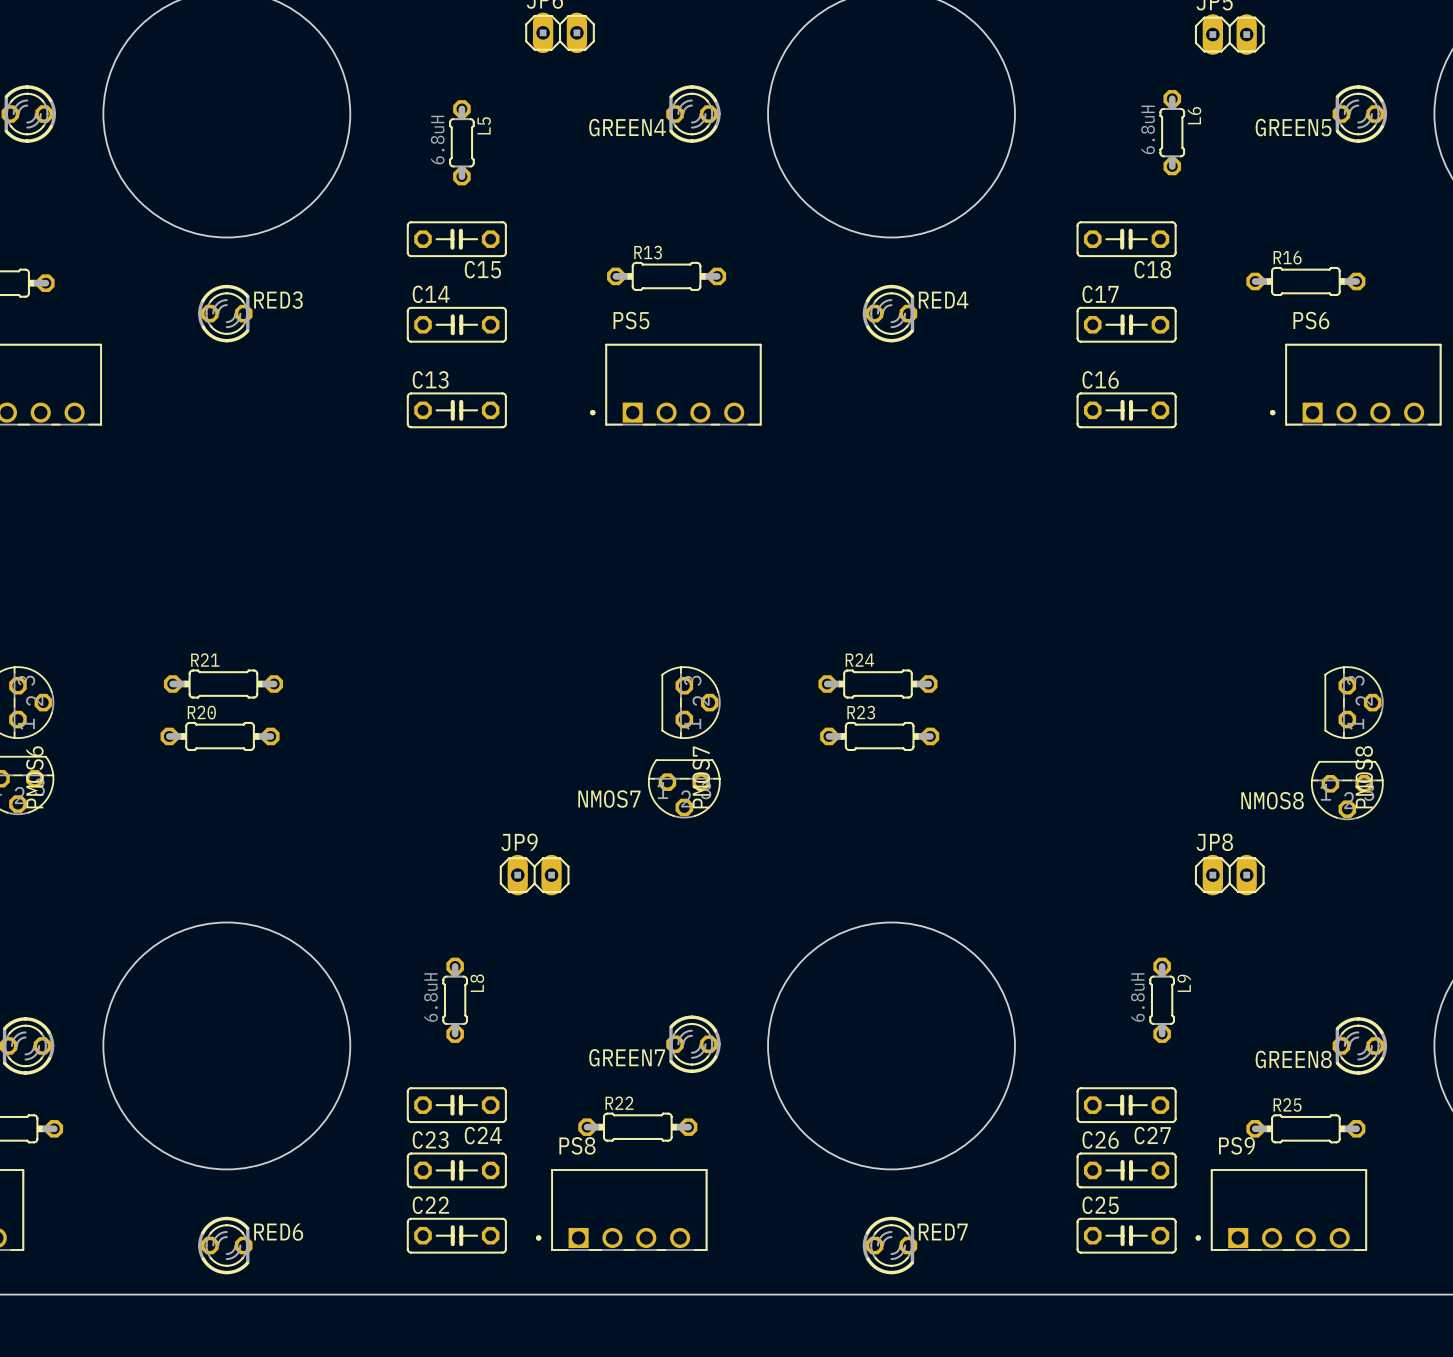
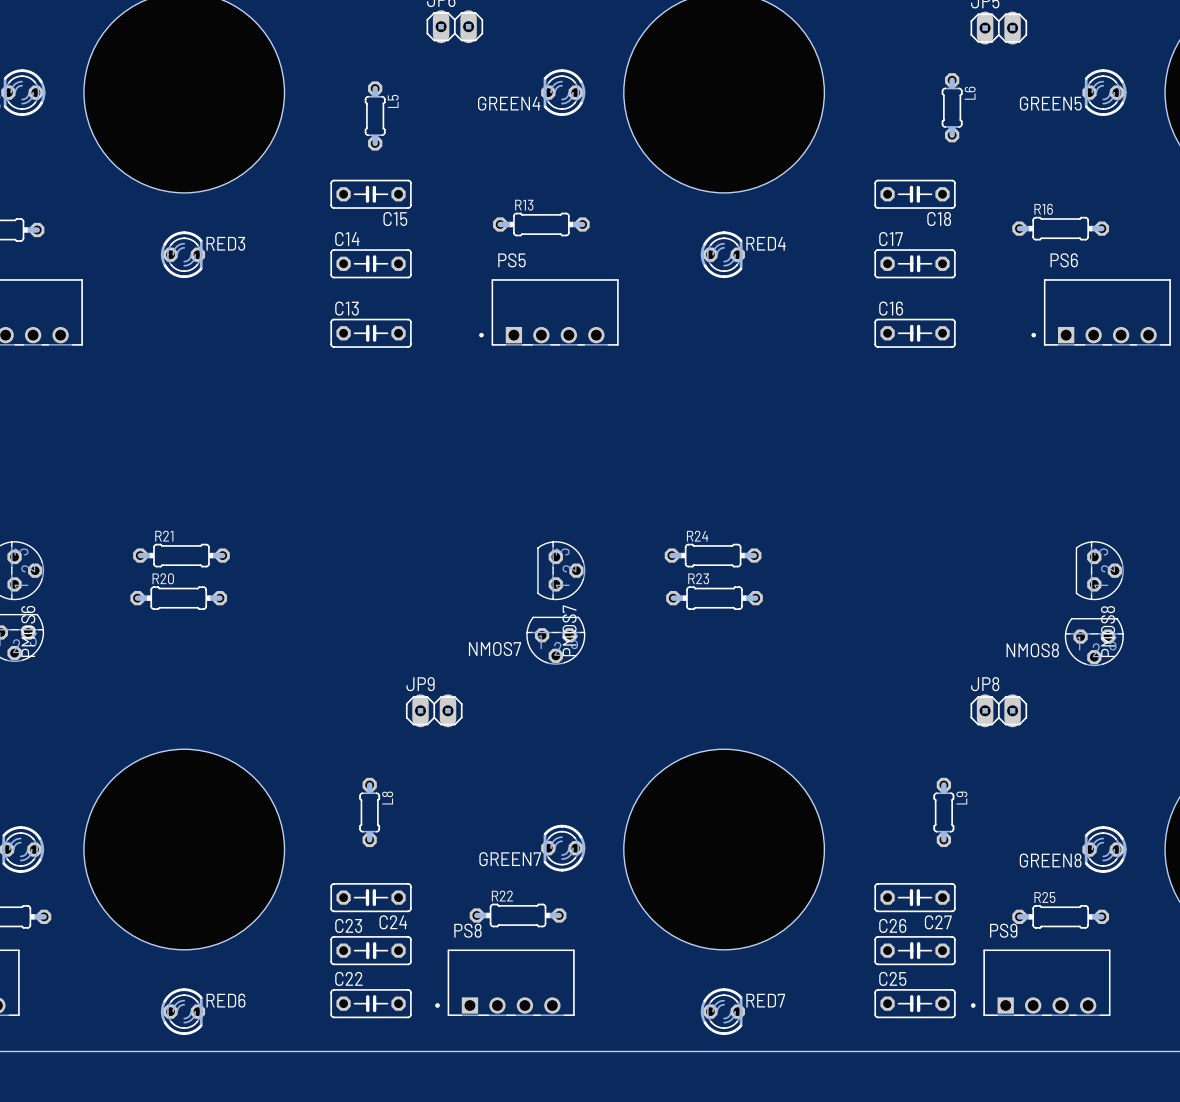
L6 value: 6.8uH (1148, 129) -> none
L5 value: 6.8uH (437, 140) -> none
L8 value: 6.8uH (430, 997) -> none
L9 value: 6.8uH (1137, 997) -> none

